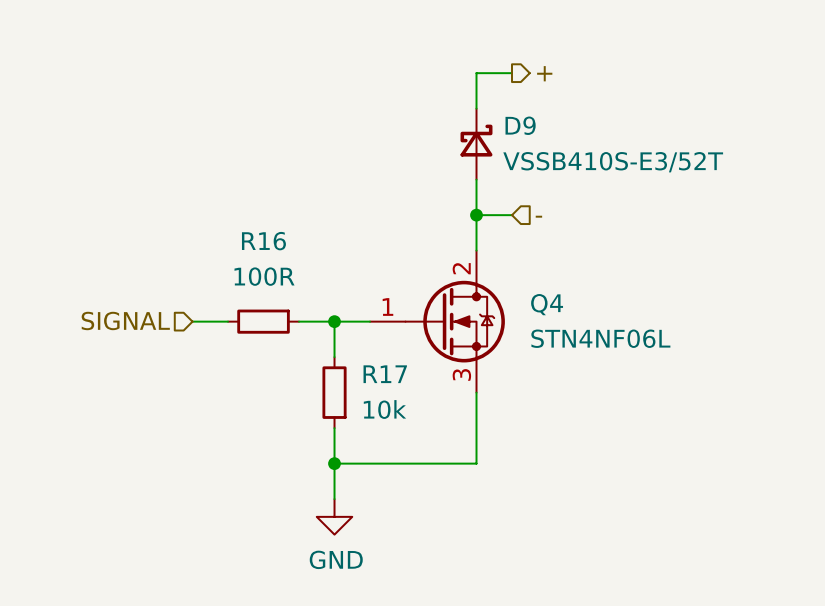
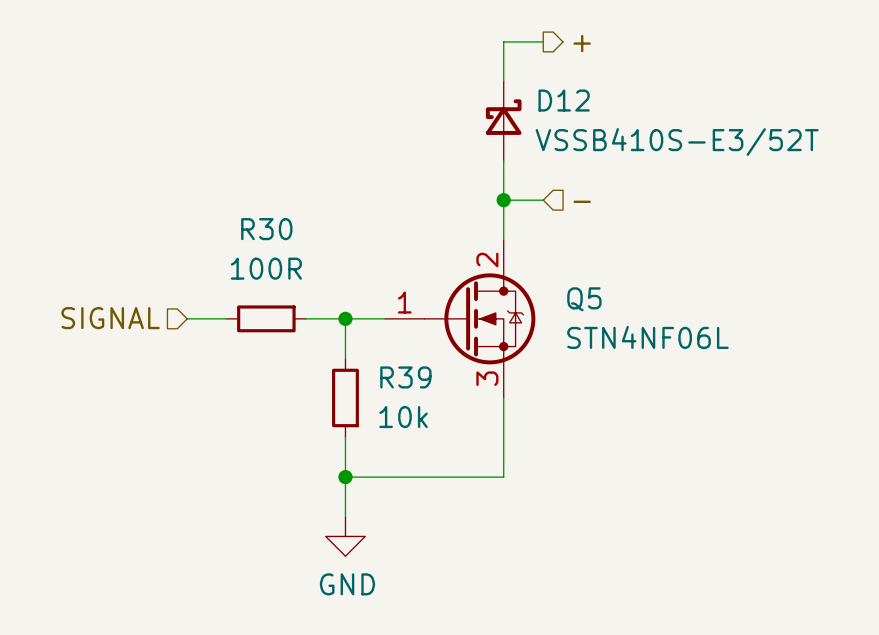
D9 name: D9 (520, 125) -> D12 (564, 100)
R16 name: R16 (263, 241) -> R30 (266, 229)
Q4 name: Q4 (547, 304) -> Q5 (584, 299)
R17 name: R17 (385, 374) -> R39 (405, 377)

